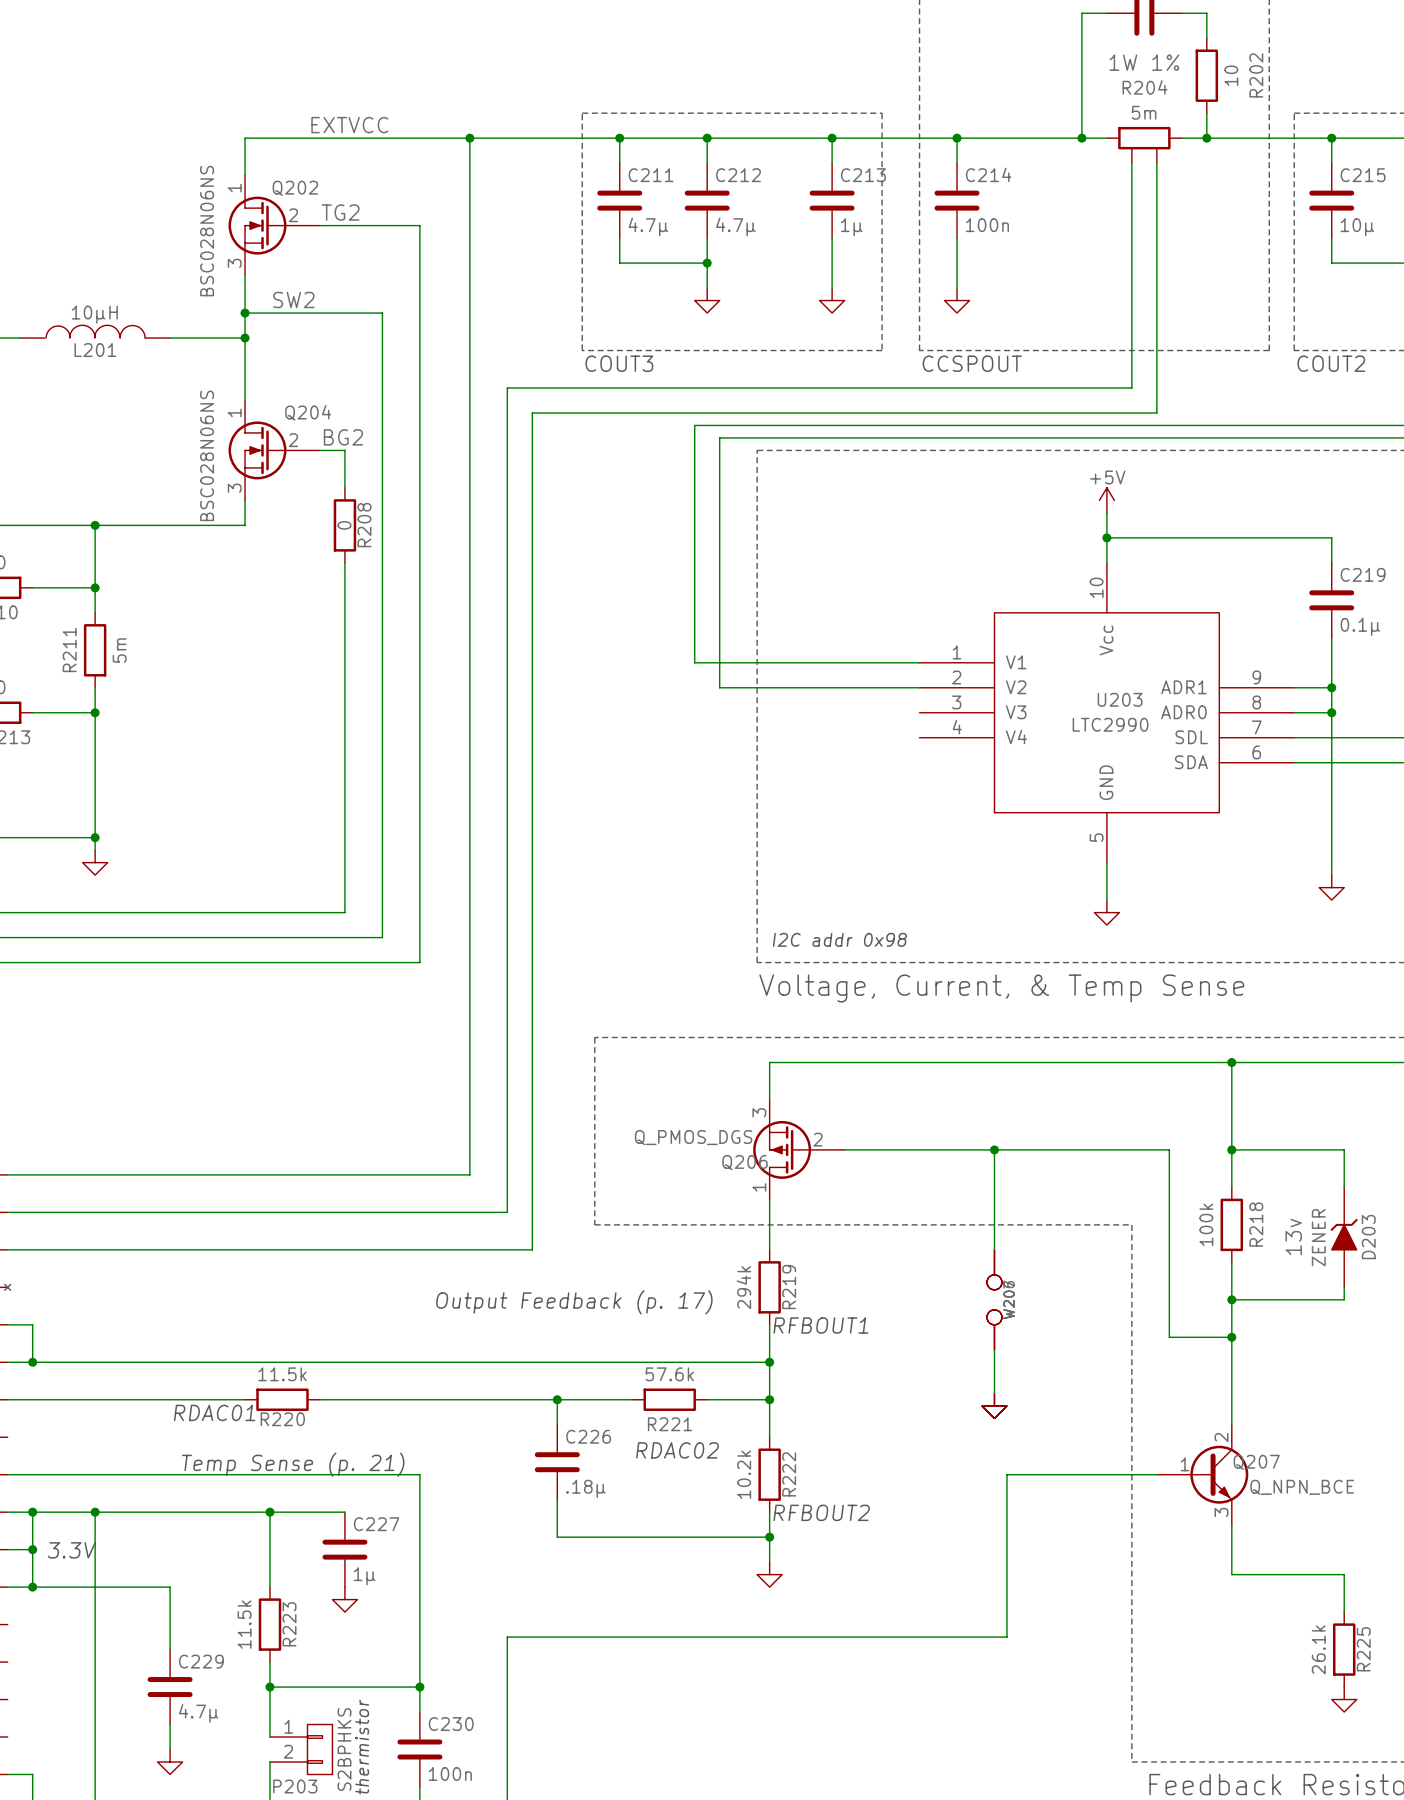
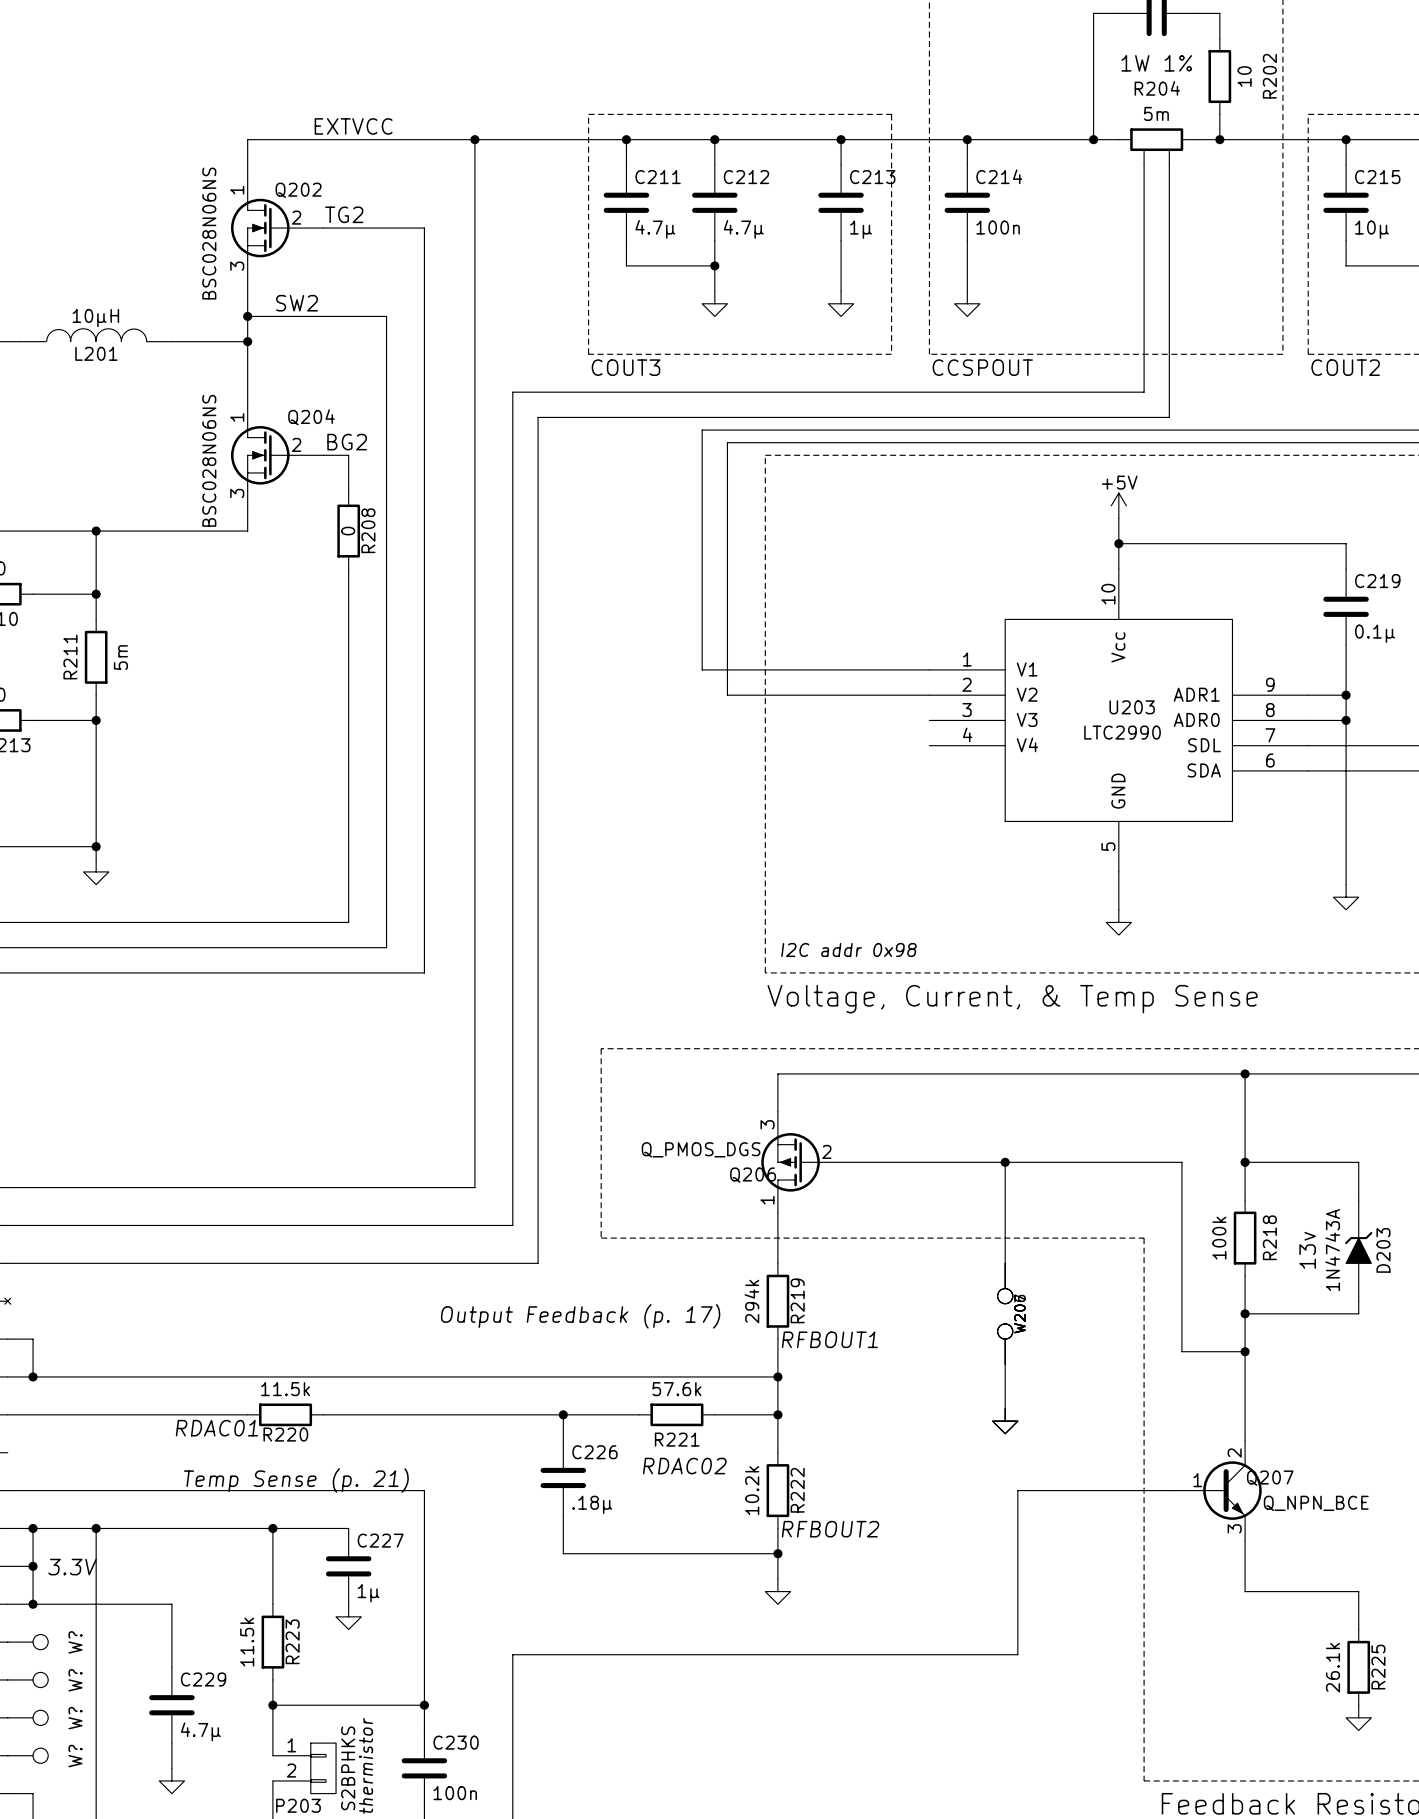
D203 value: ZENER (1318, 1237) -> 1N4743A (1332, 1250)
W?: none -> (27, 1642)
W?: none -> (27, 1679)
W?: none -> (27, 1717)
W?: none -> (27, 1755)

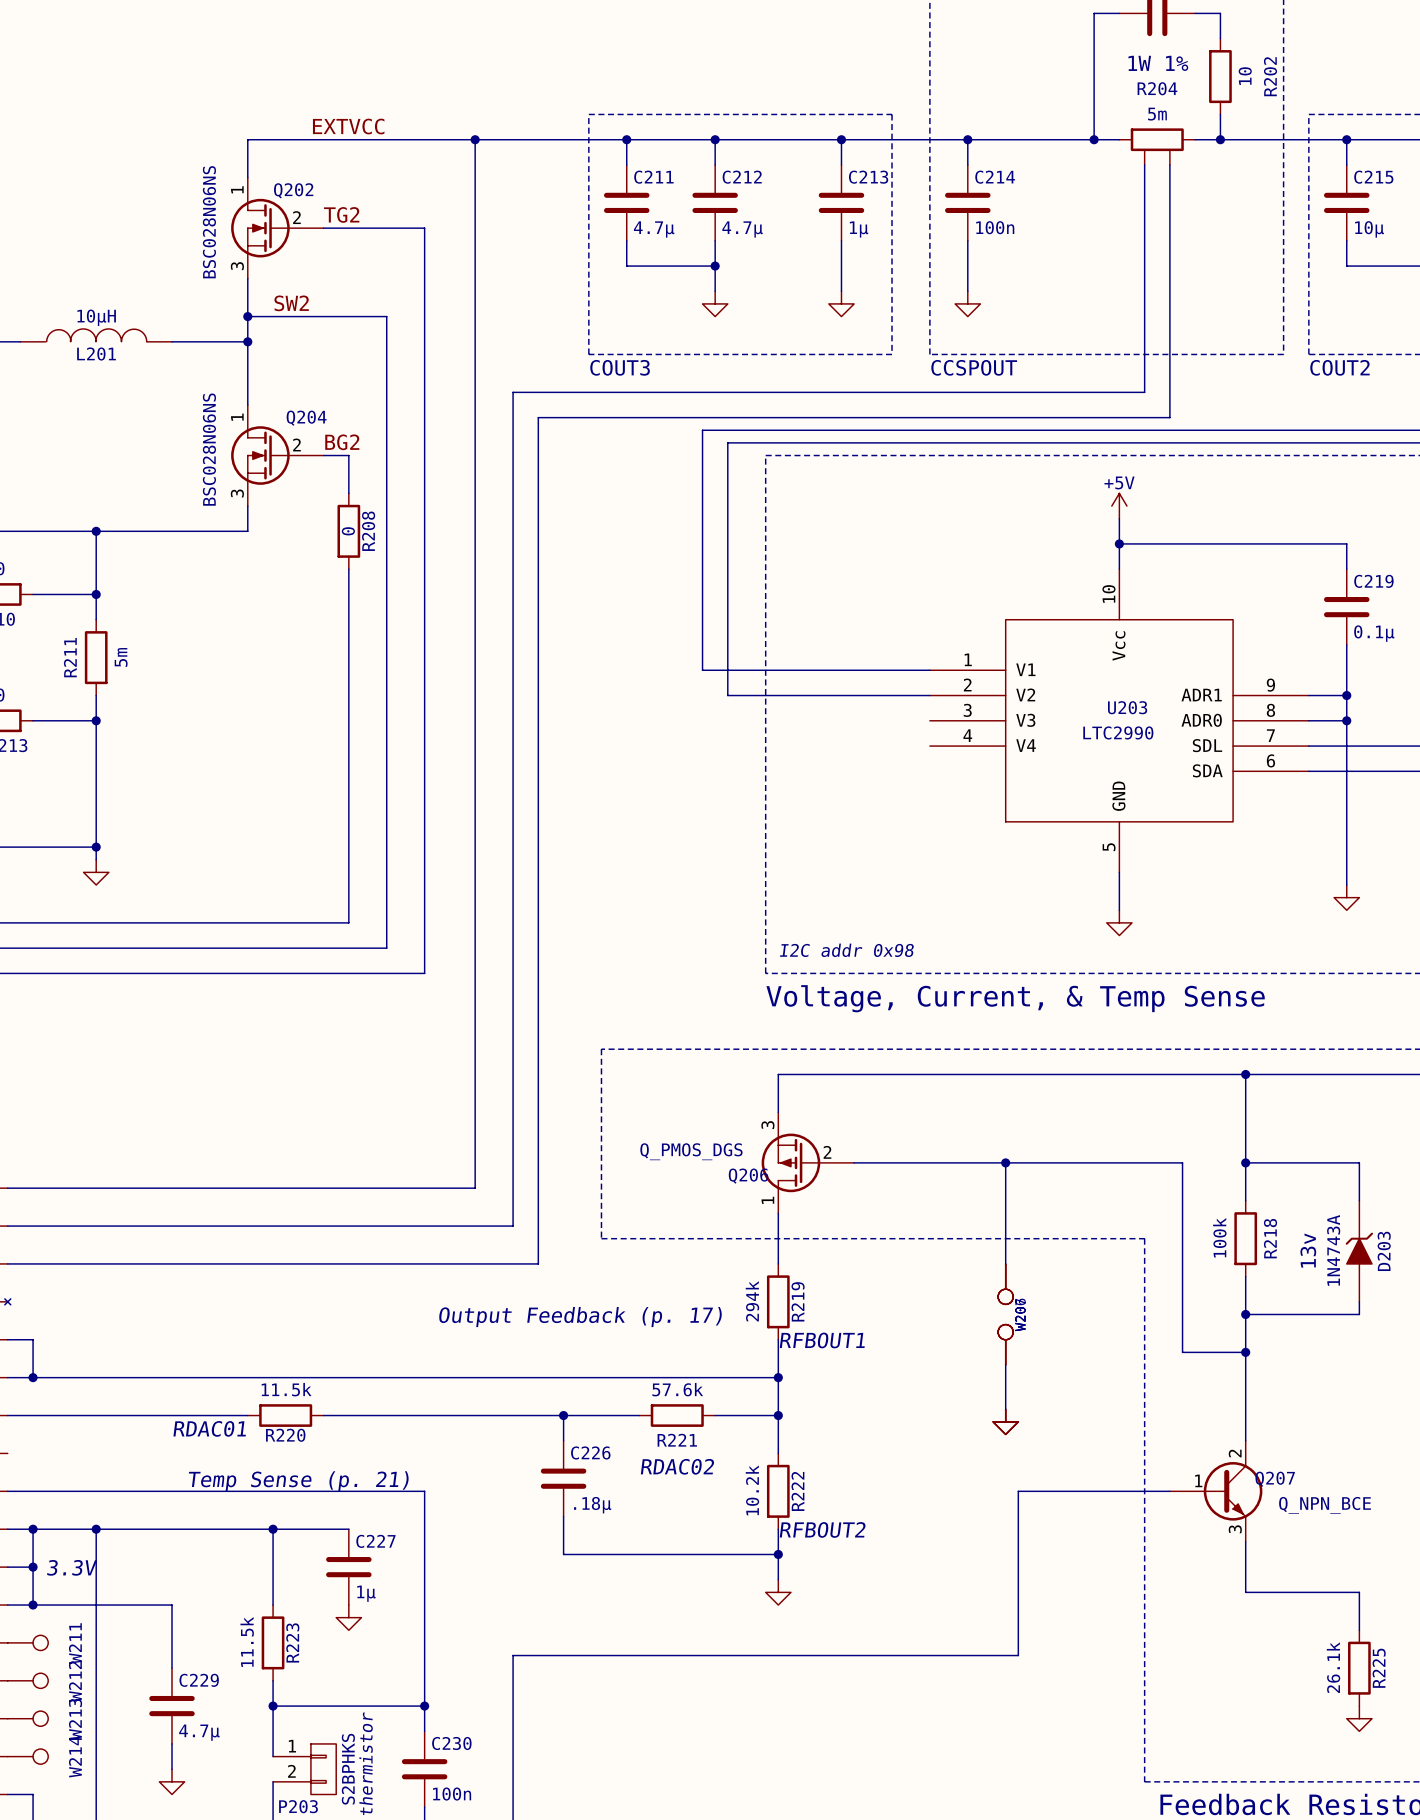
W? name: W? (75, 1642) -> W211 (75, 1643)
W? name: W? (75, 1680) -> W212 (75, 1681)
W? name: W? (75, 1718) -> W213 (75, 1719)
W? name: W? (75, 1756) -> W214 (75, 1757)

